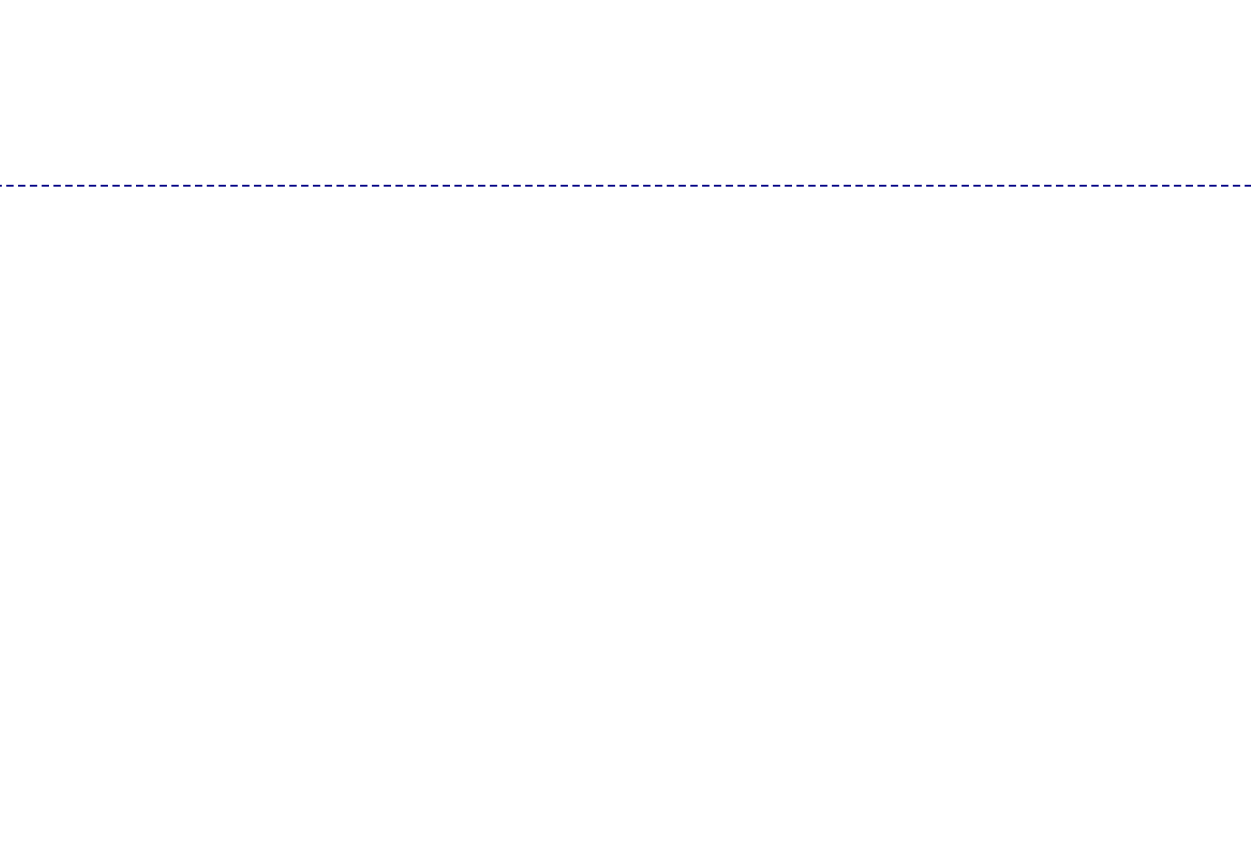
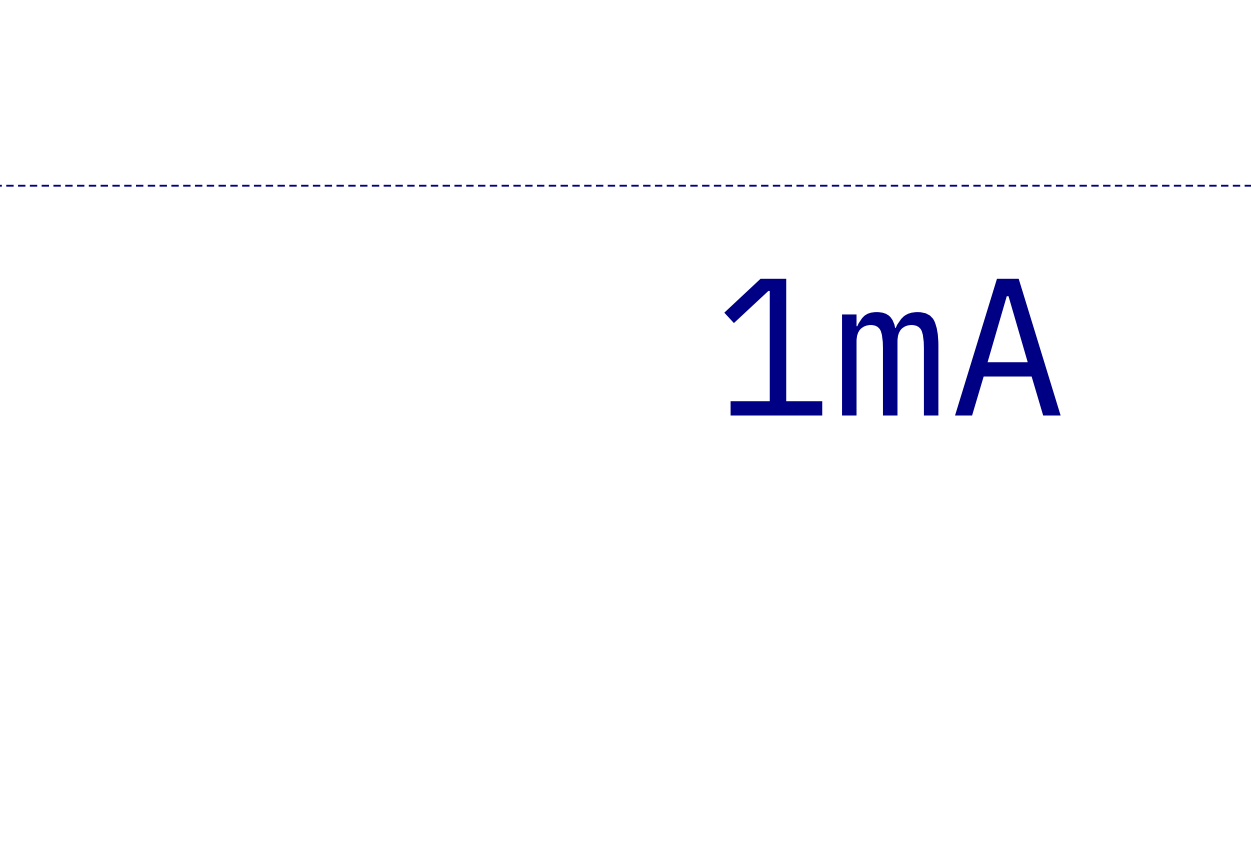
text: none -> 1mA (892, 347)

